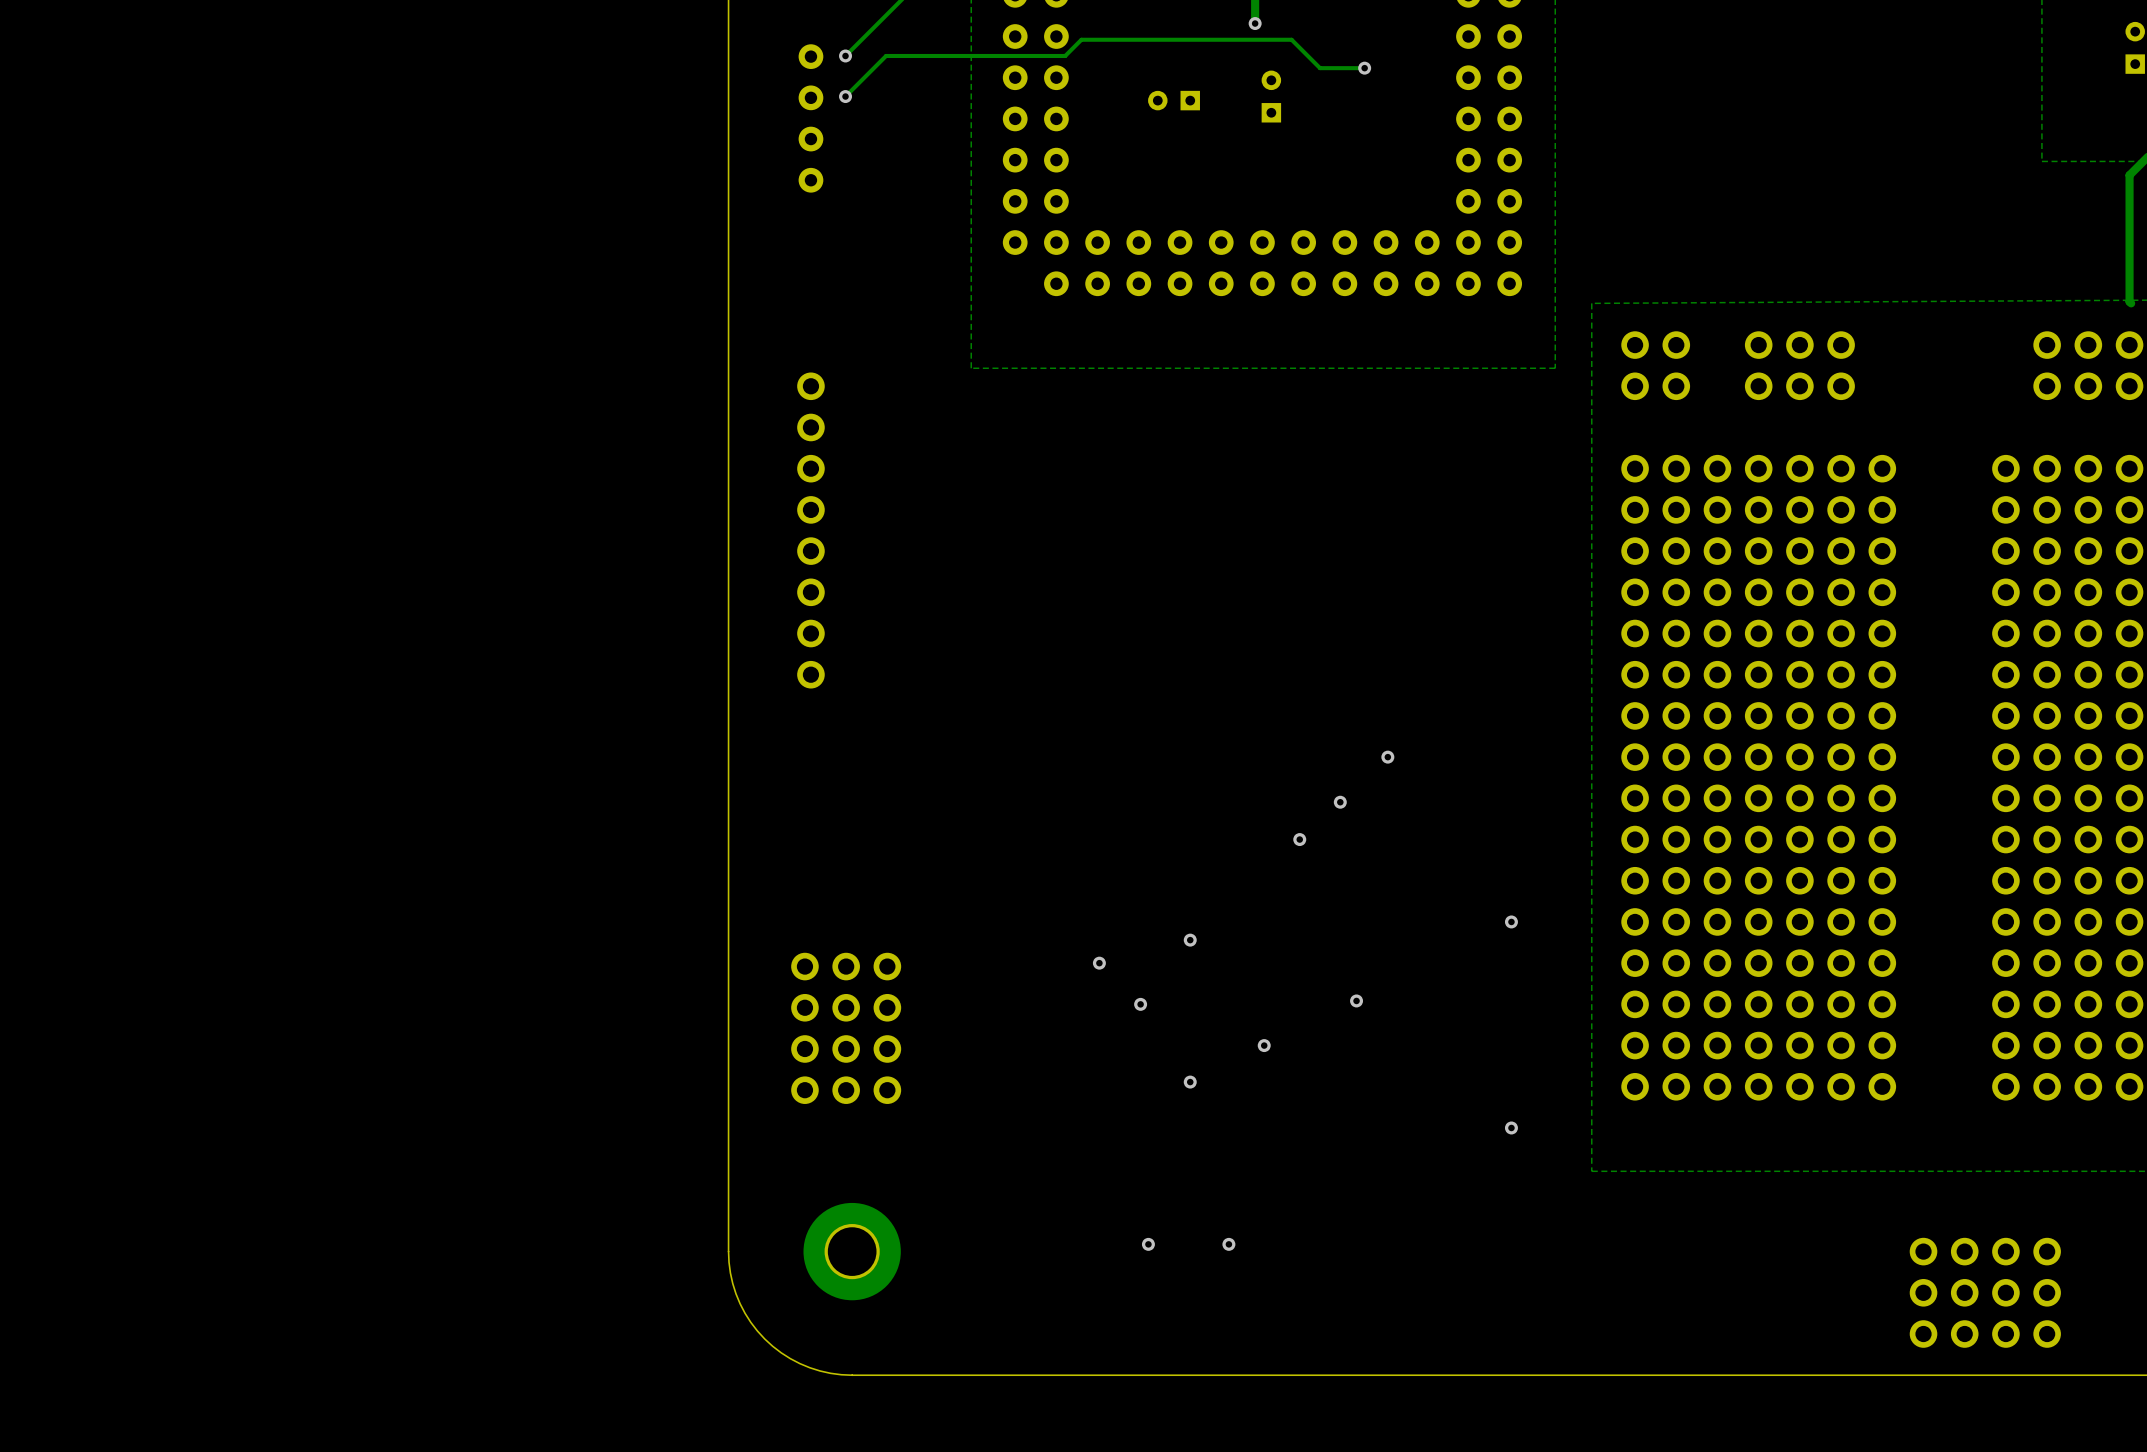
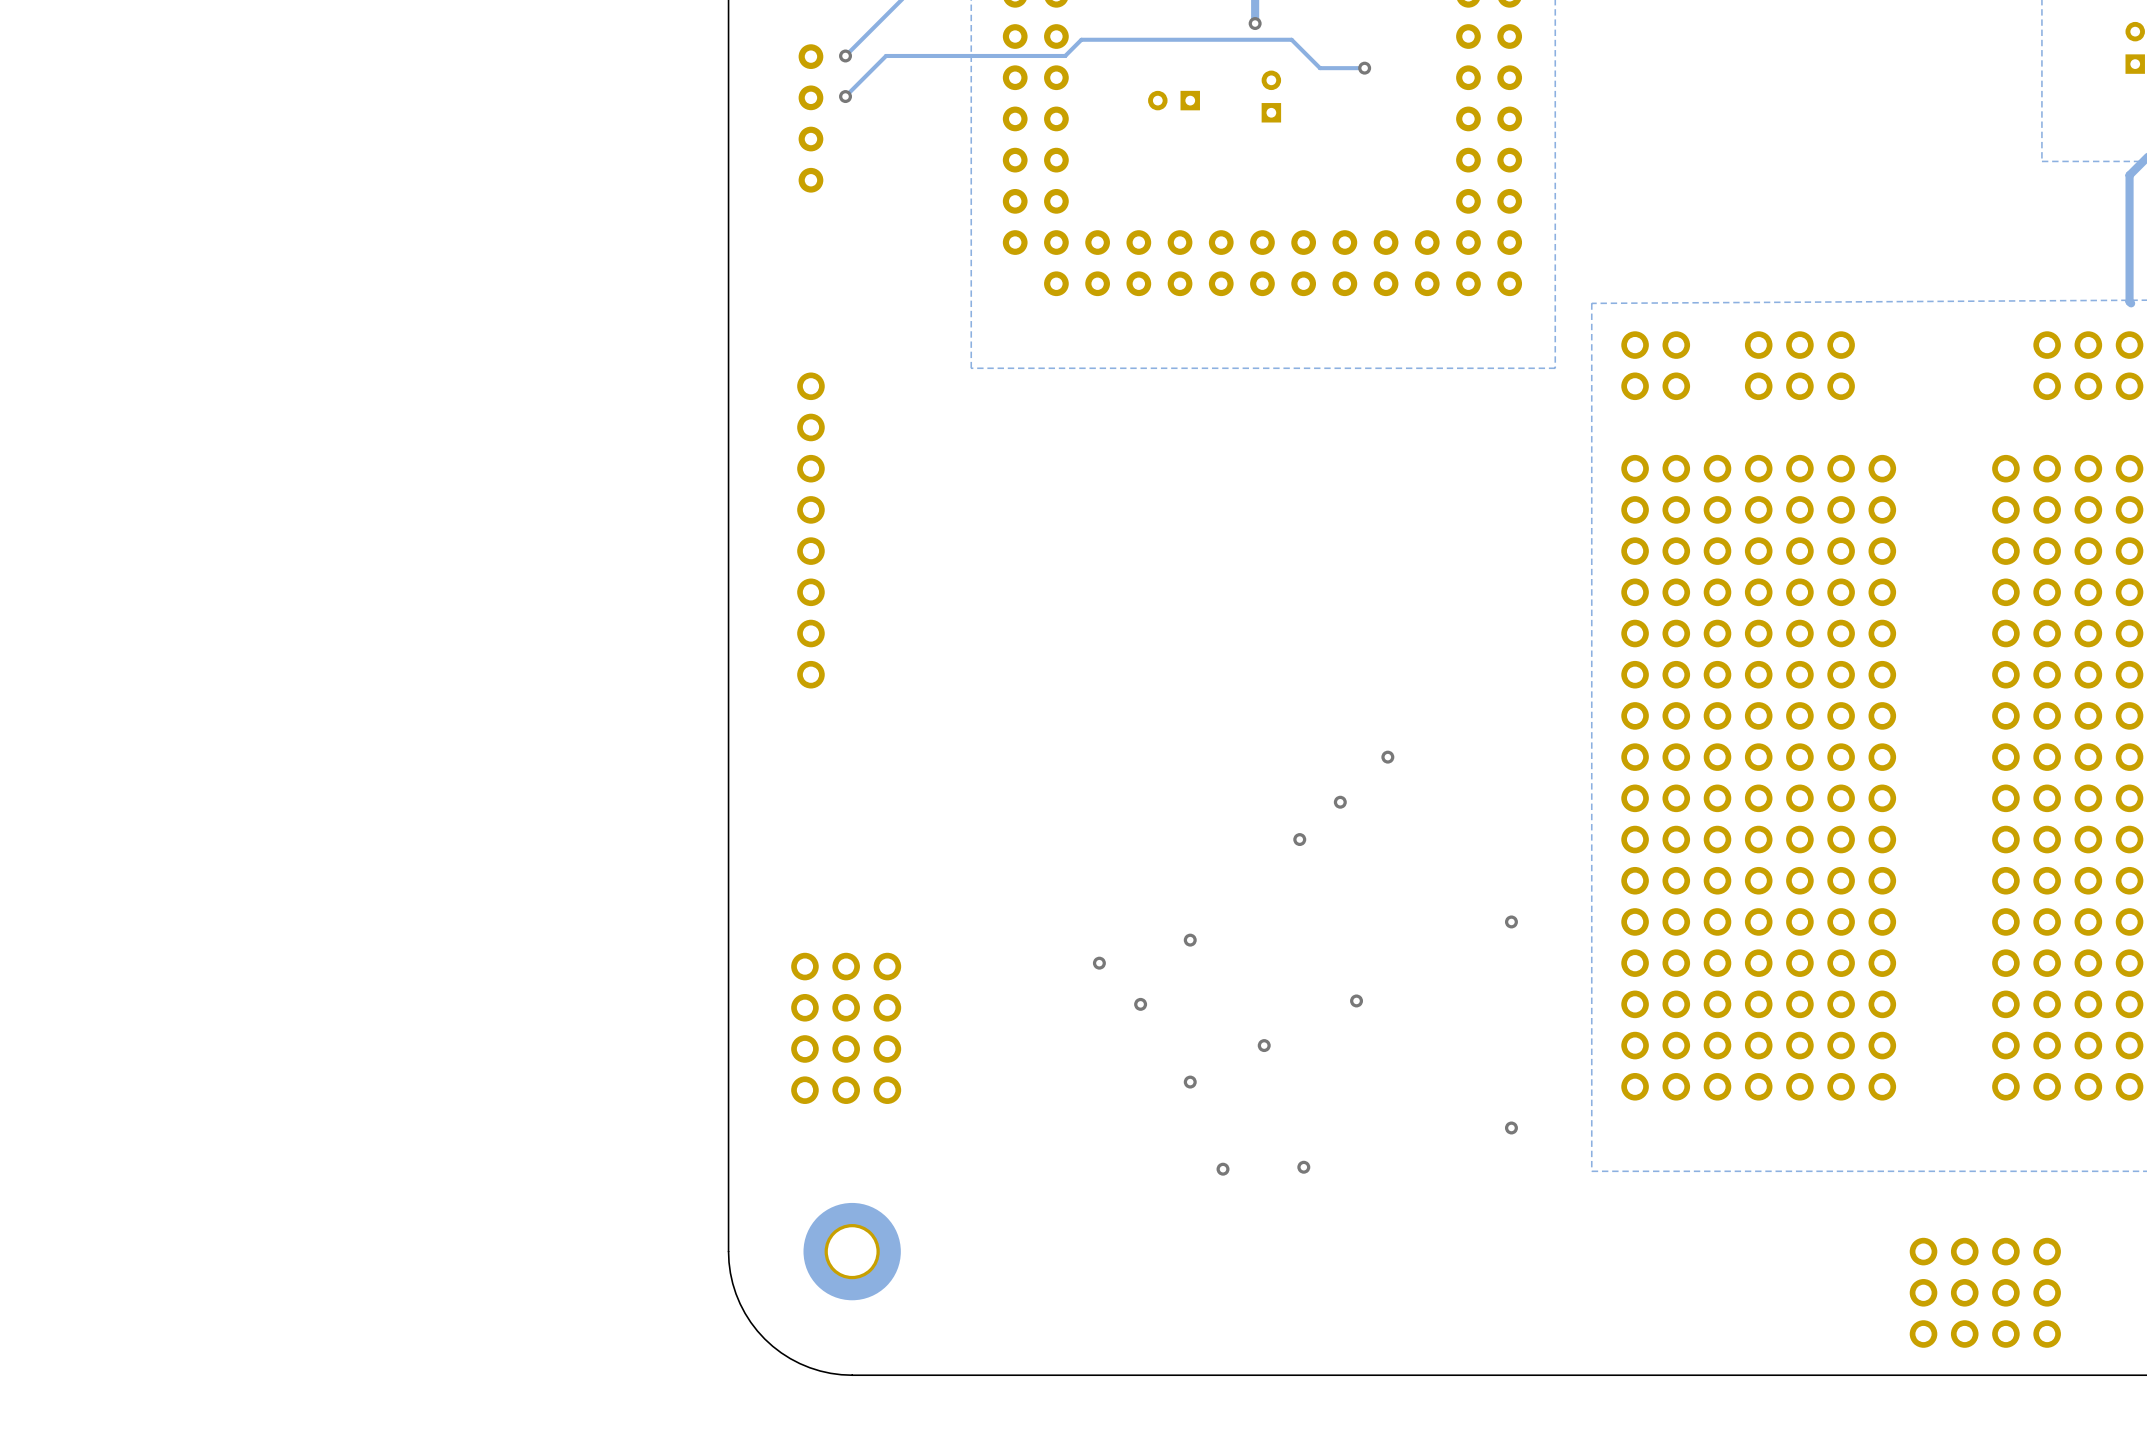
via: none -> (1303, 1167)
via: none -> (1223, 1169)
via: (1148, 1244) -> none
via: (1228, 1244) -> none

